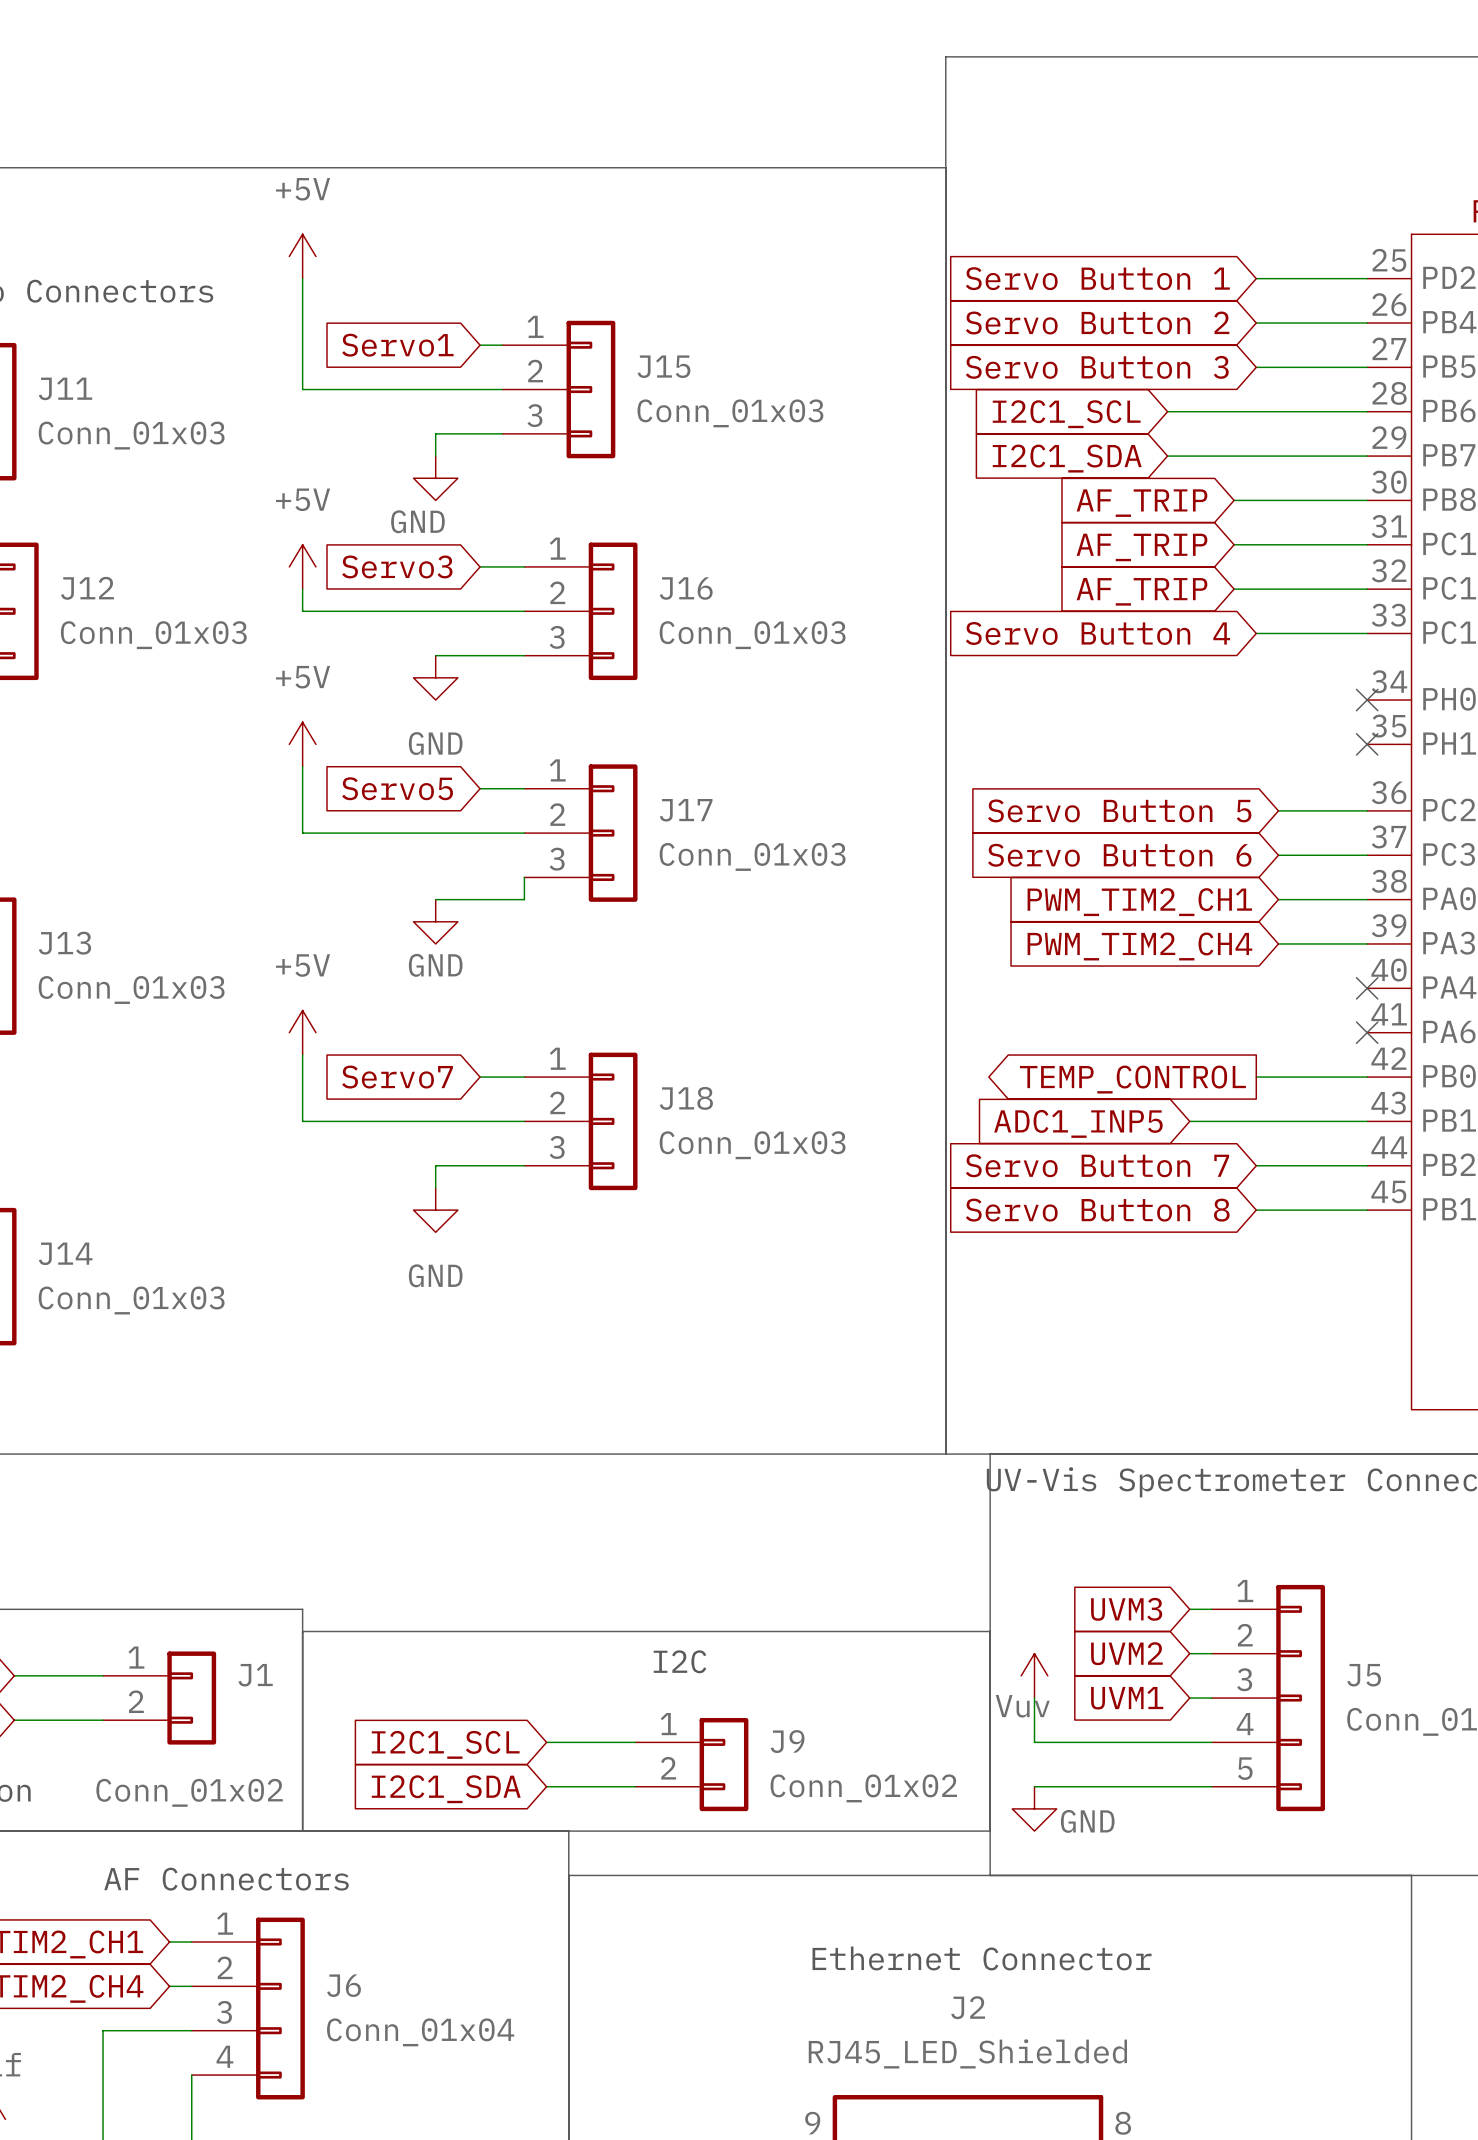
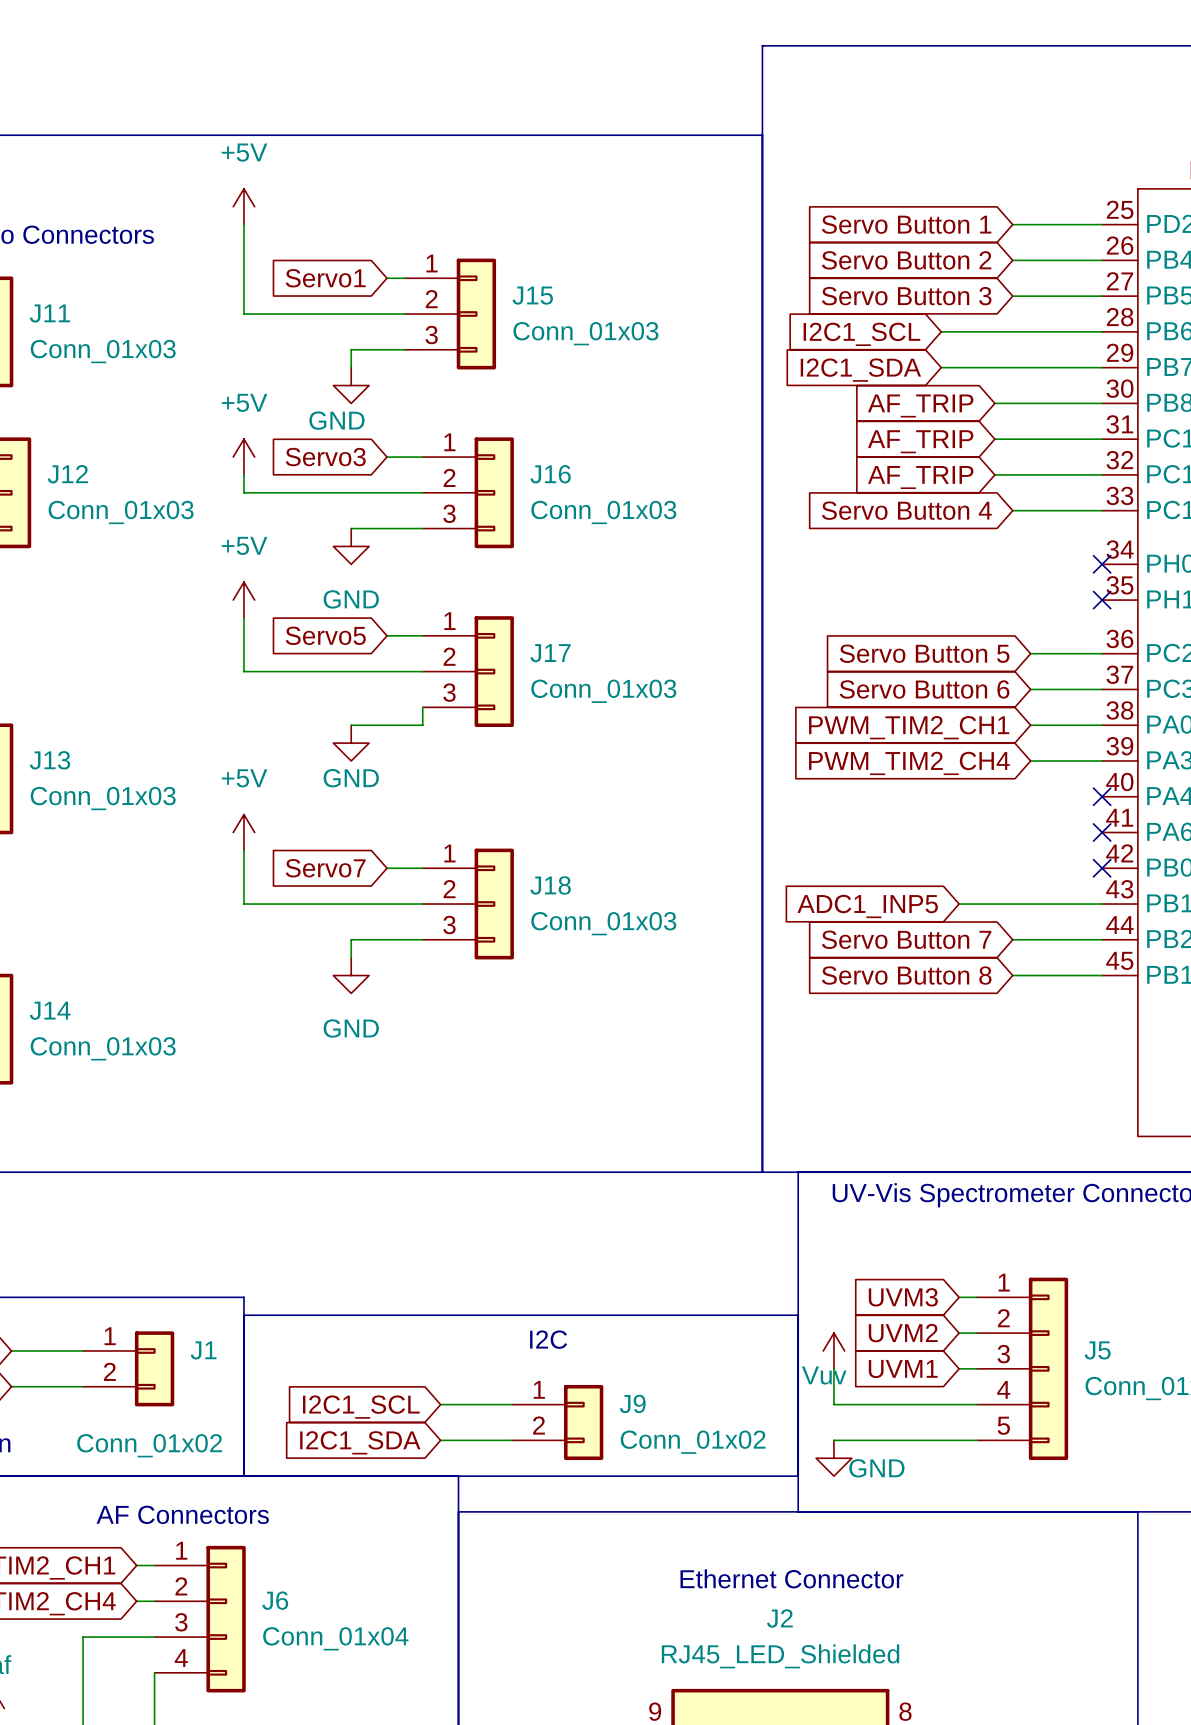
wire: (1256, 1077) (1367, 1077) -> none
no-connect mark: none -> (1102, 868)
global label: TEMP_CONTROL (1132, 1079) -> none

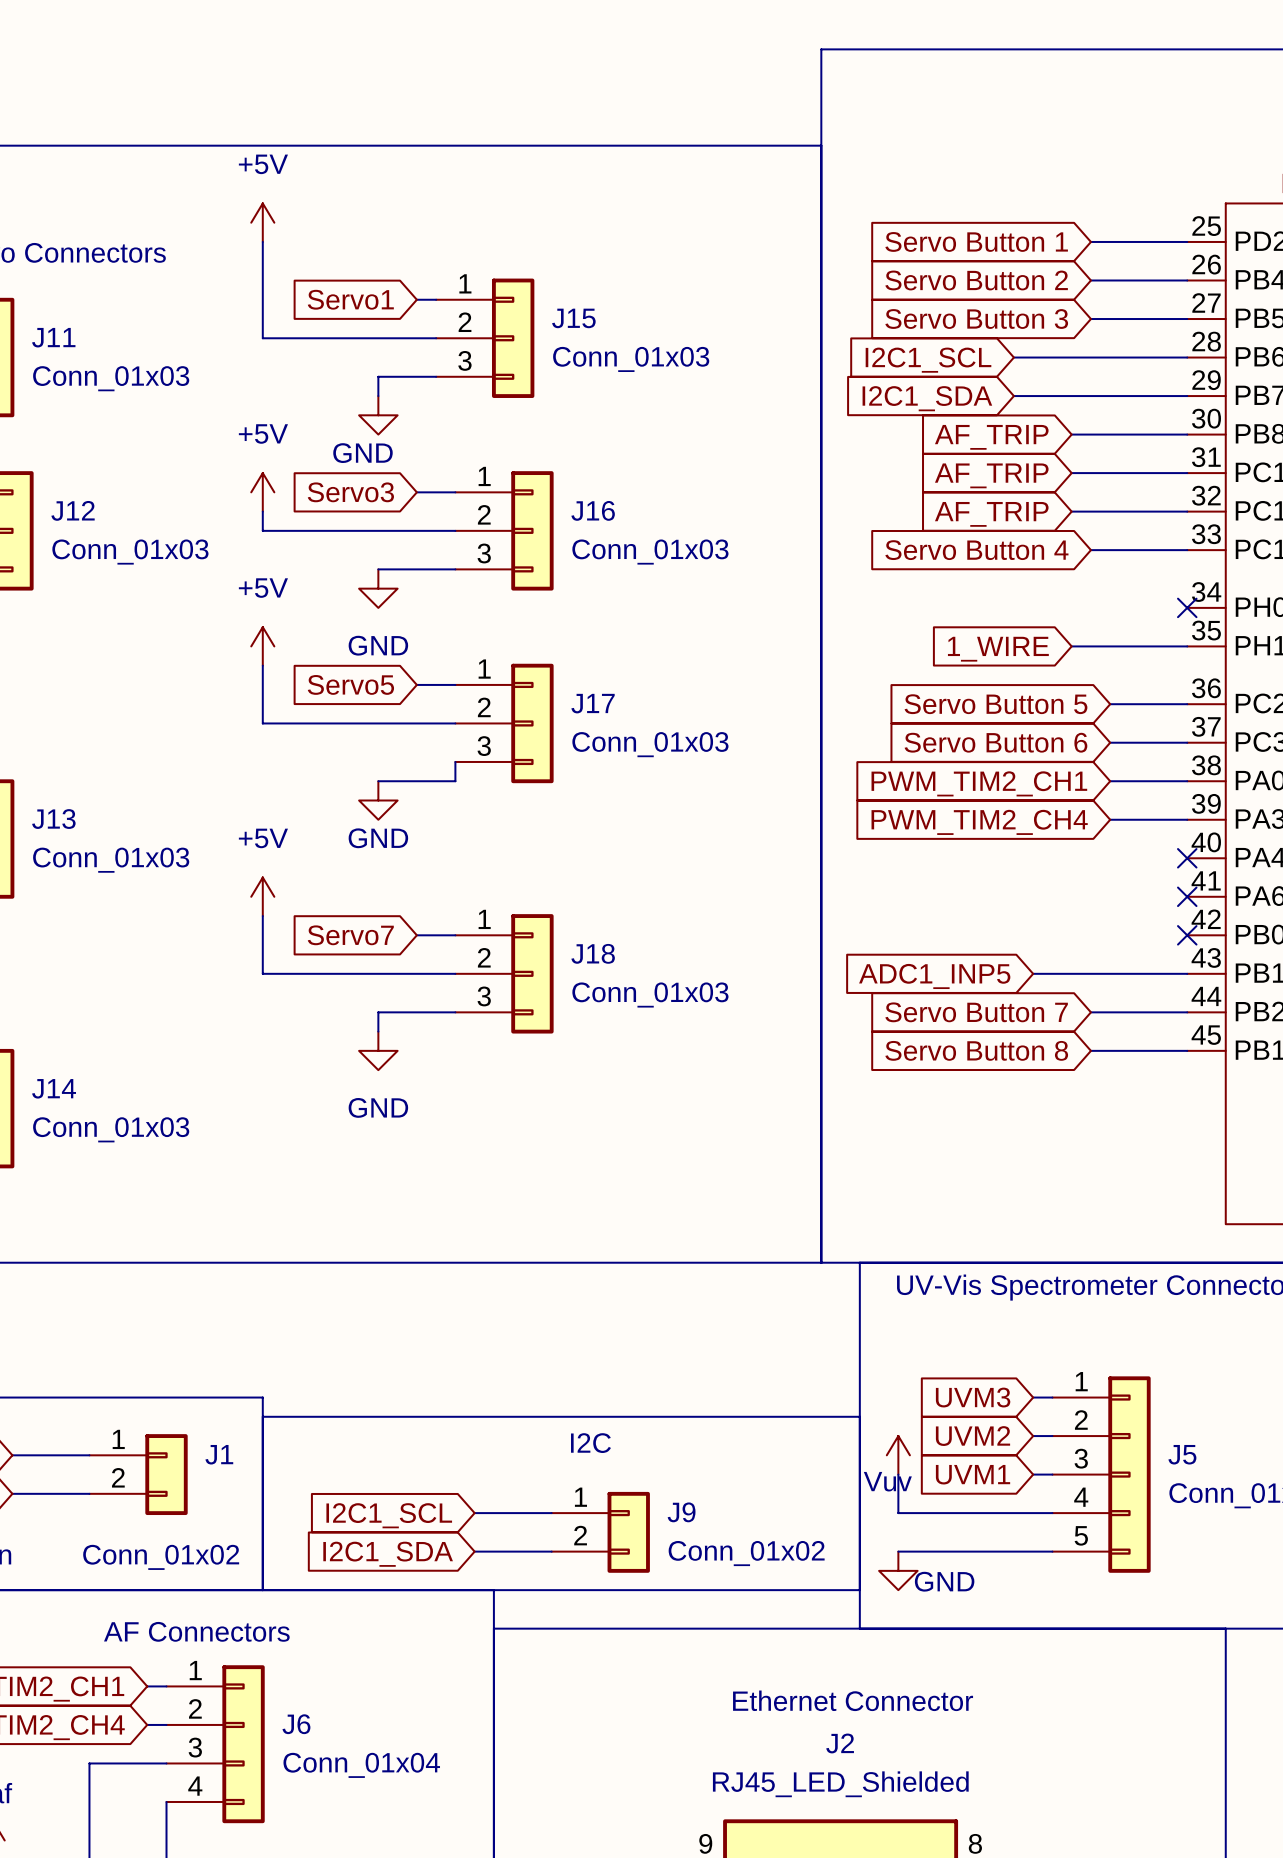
wire: none -> (1071, 646) (1187, 646)
no-connect mark: (1102, 600) -> none
global label: none -> 1_WIRE (998, 649)

